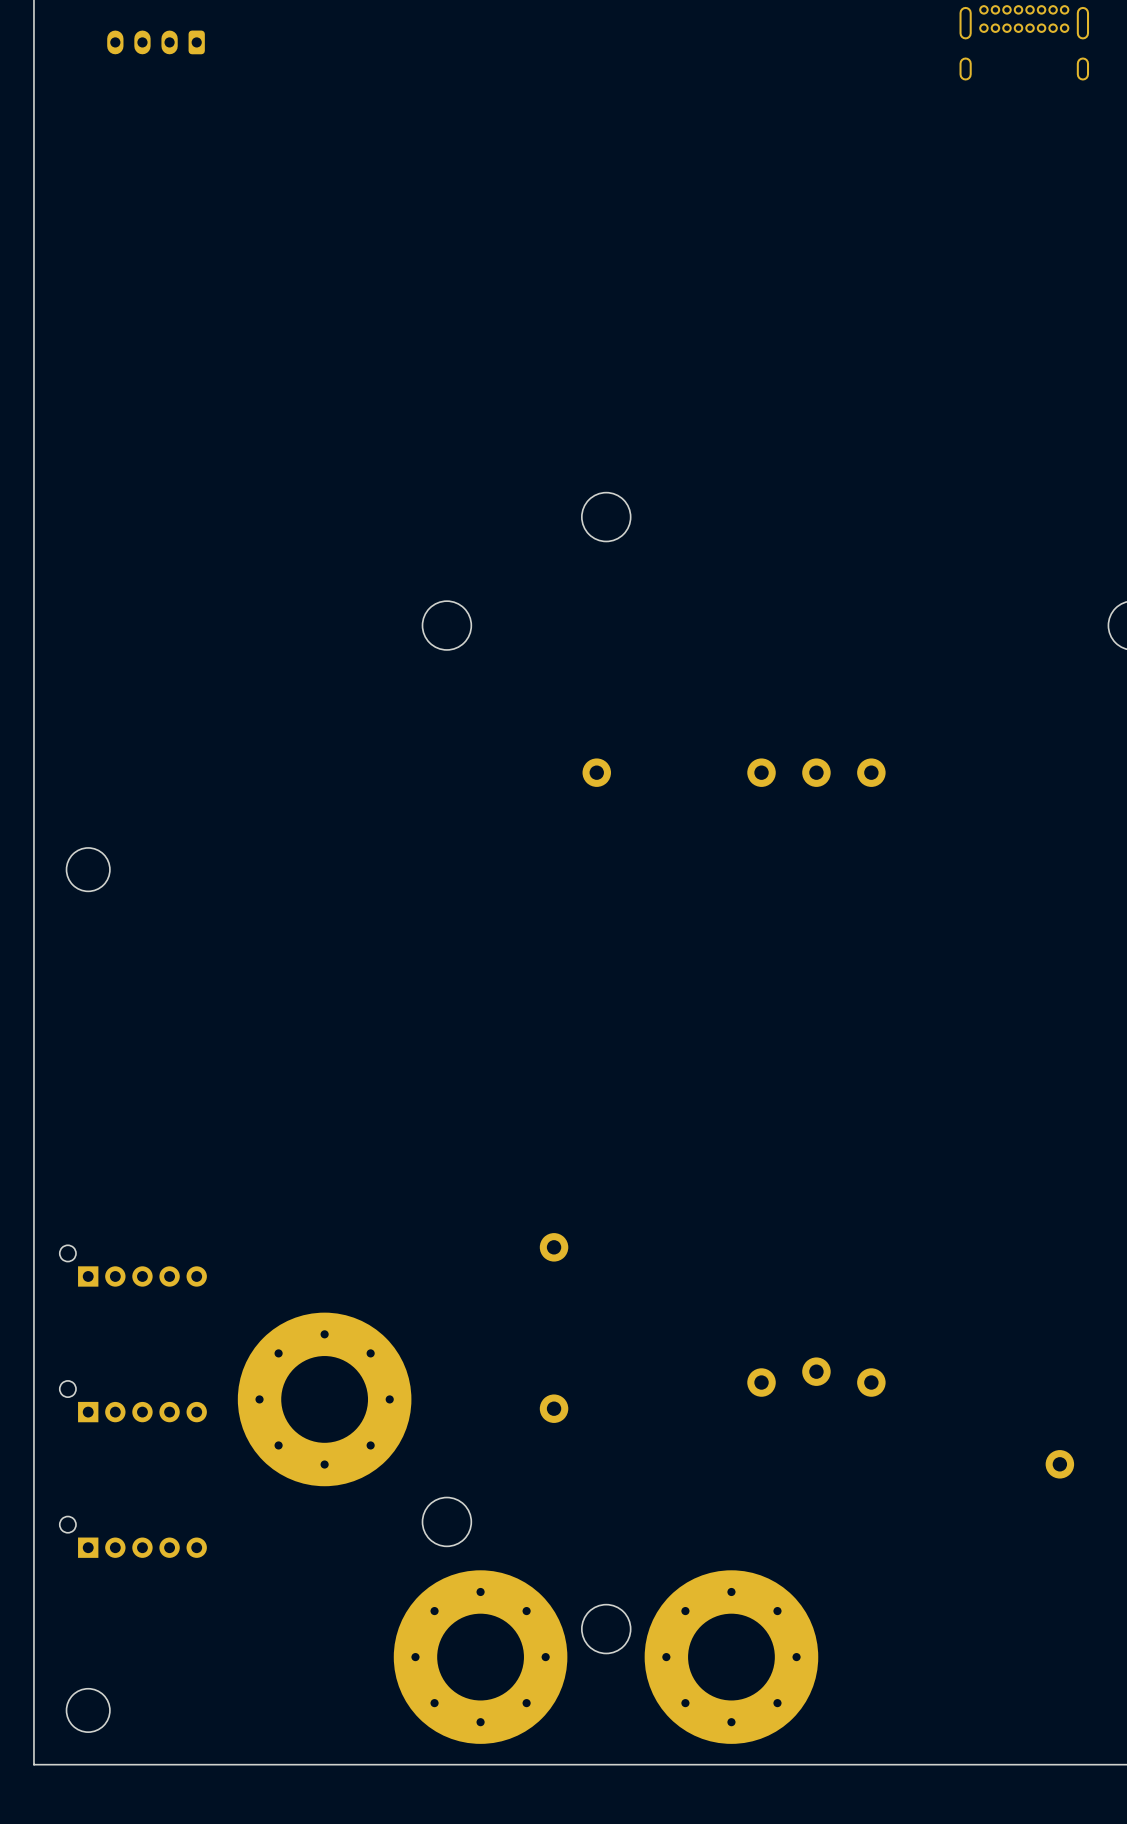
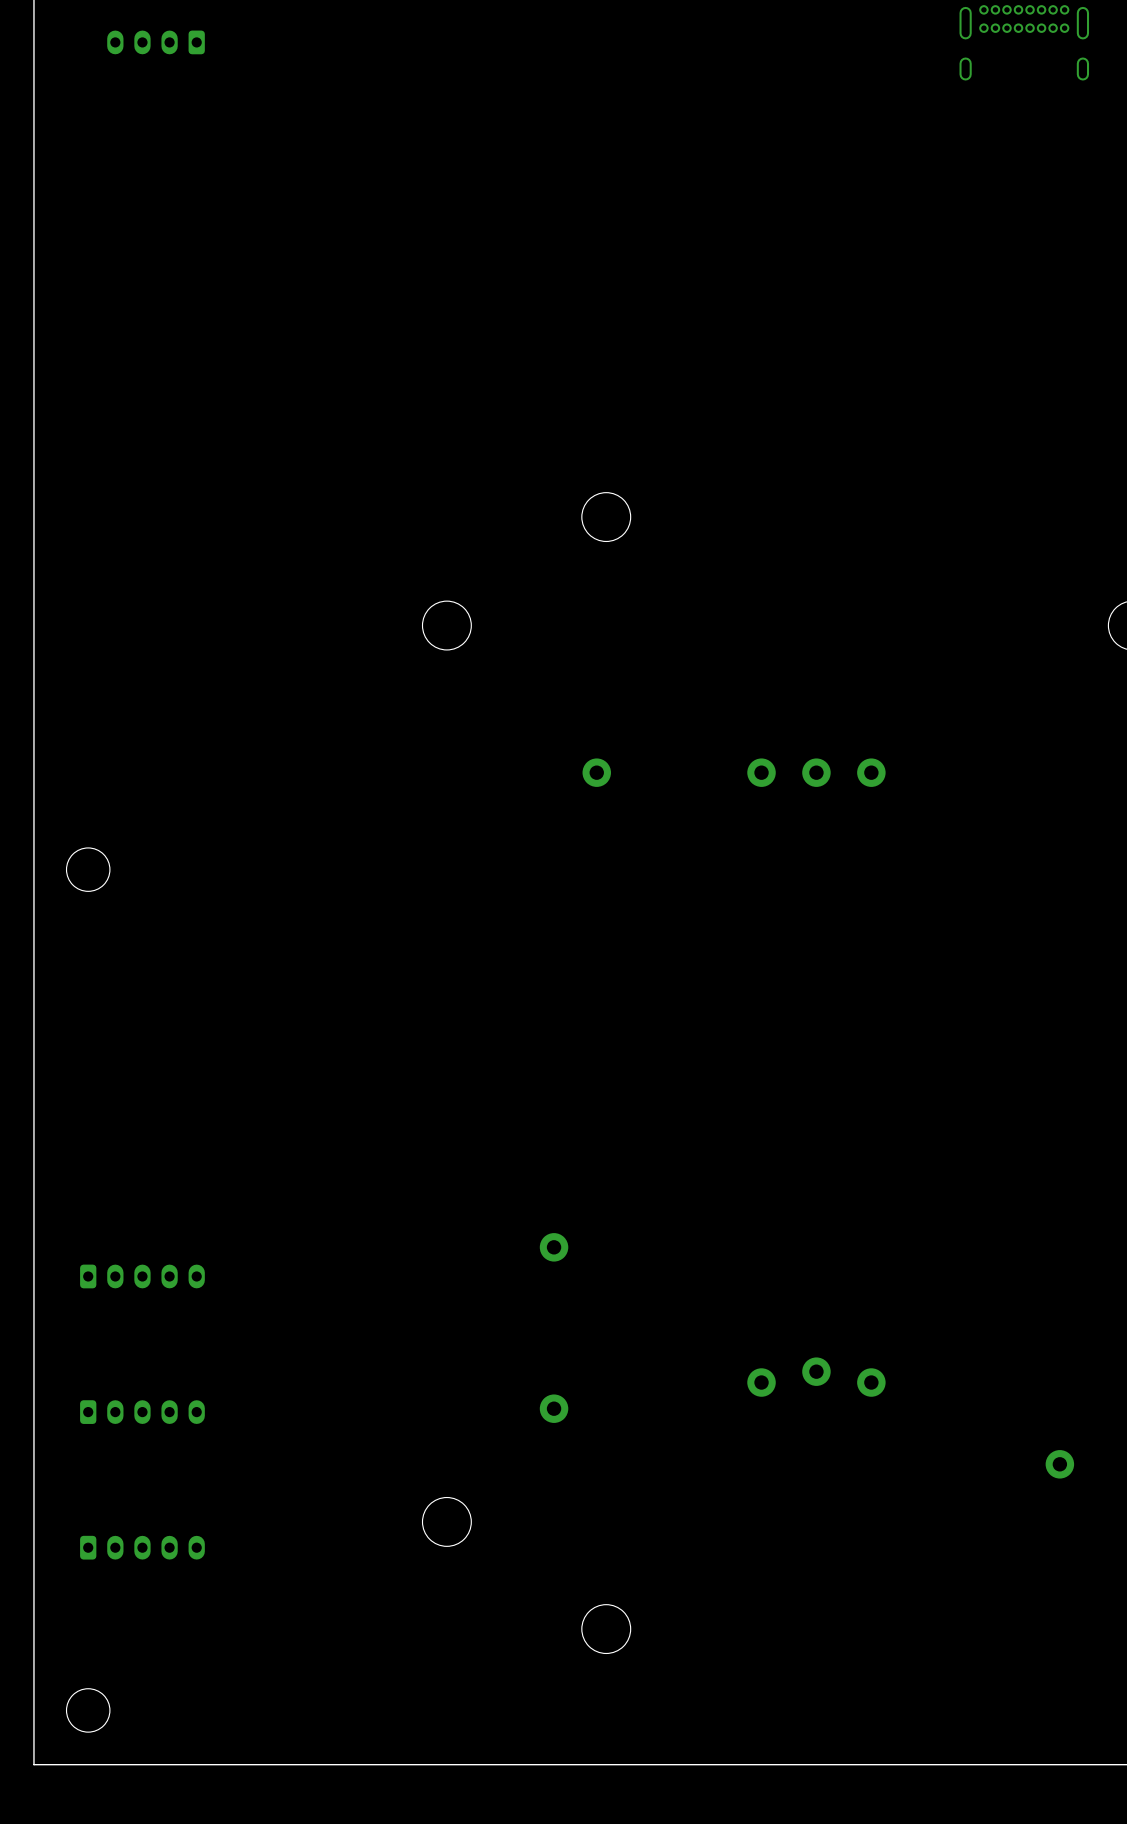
part: (133, 1265) -> none
part: none -> (142, 1276)
part: (324, 1399) -> none
part: (133, 1401) -> none
part: none -> (142, 1412)
part: (133, 1537) -> none
part: none -> (142, 1547)
part: (480, 1657) -> none
part: (731, 1657) -> none

